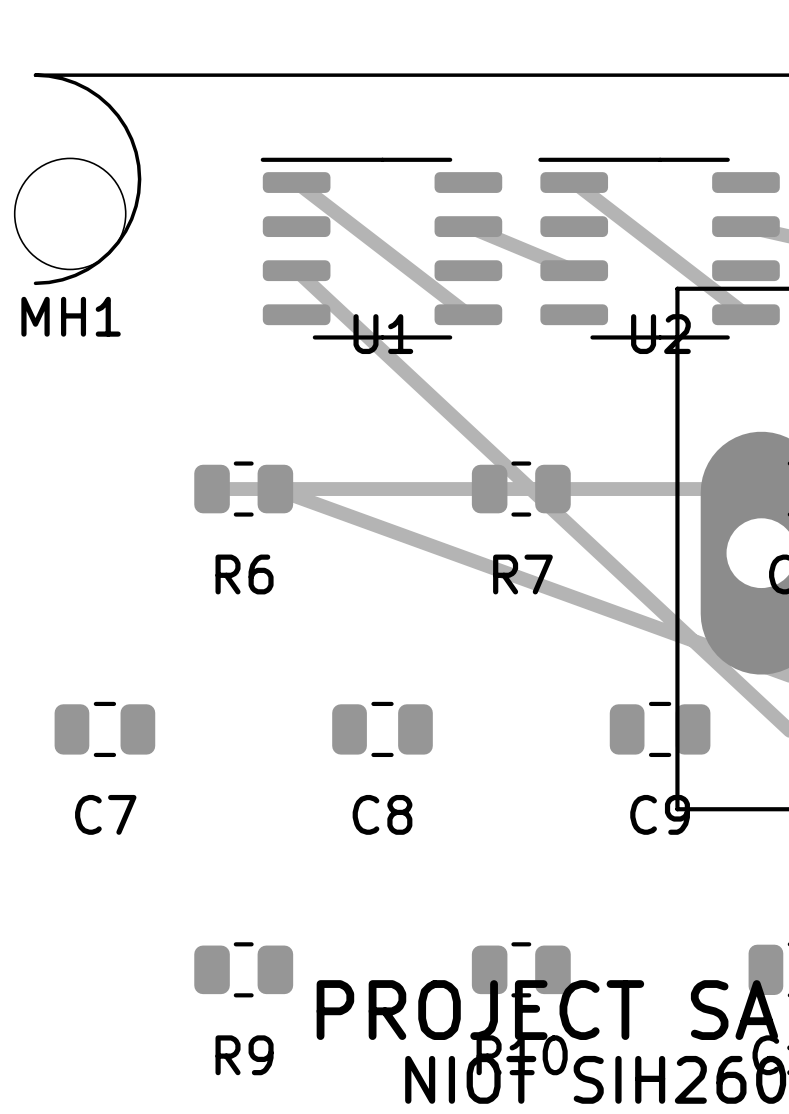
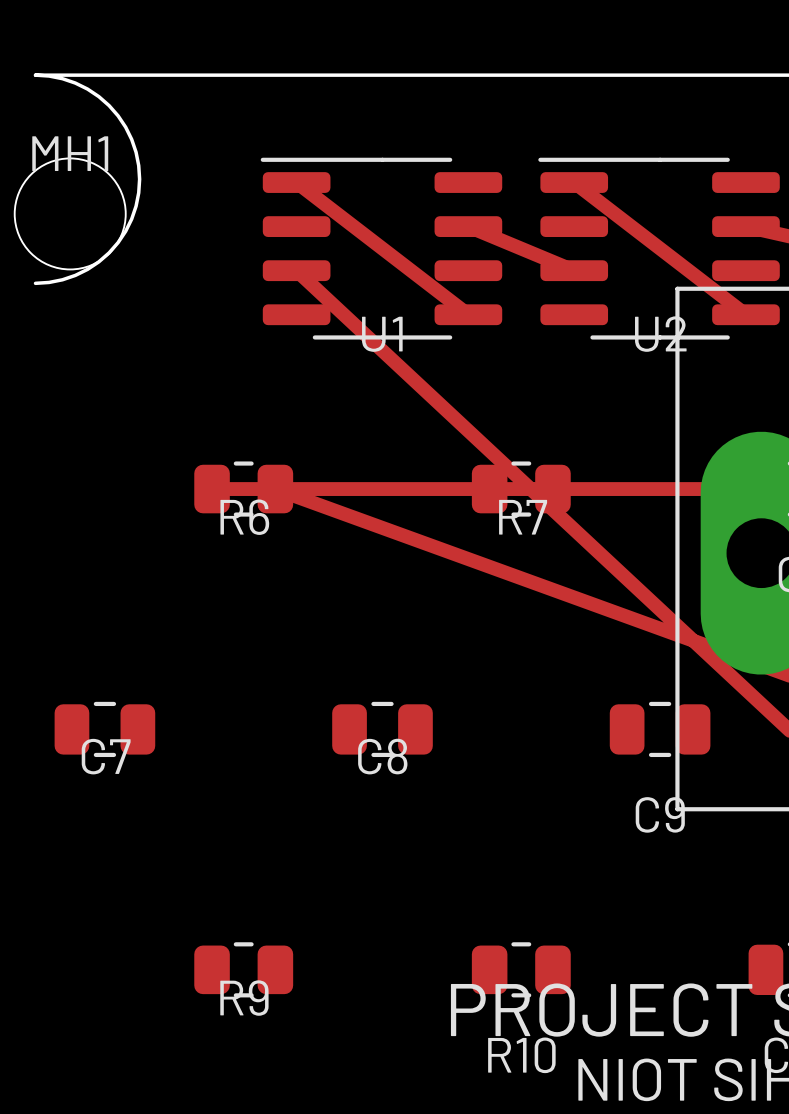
MH1 name position: MH1 (71, 316) -> MH1 (70, 153)
R6 name position: R6 (244, 574) -> R6 (244, 517)
R7 name position: R7 (522, 574) -> R7 (523, 517)
C7 name position: C7 (105, 814) -> C7 (106, 756)
C8 name position: C8 (382, 814) -> C8 (382, 756)
R9 name position: R9 (244, 1055) -> R9 (244, 998)

